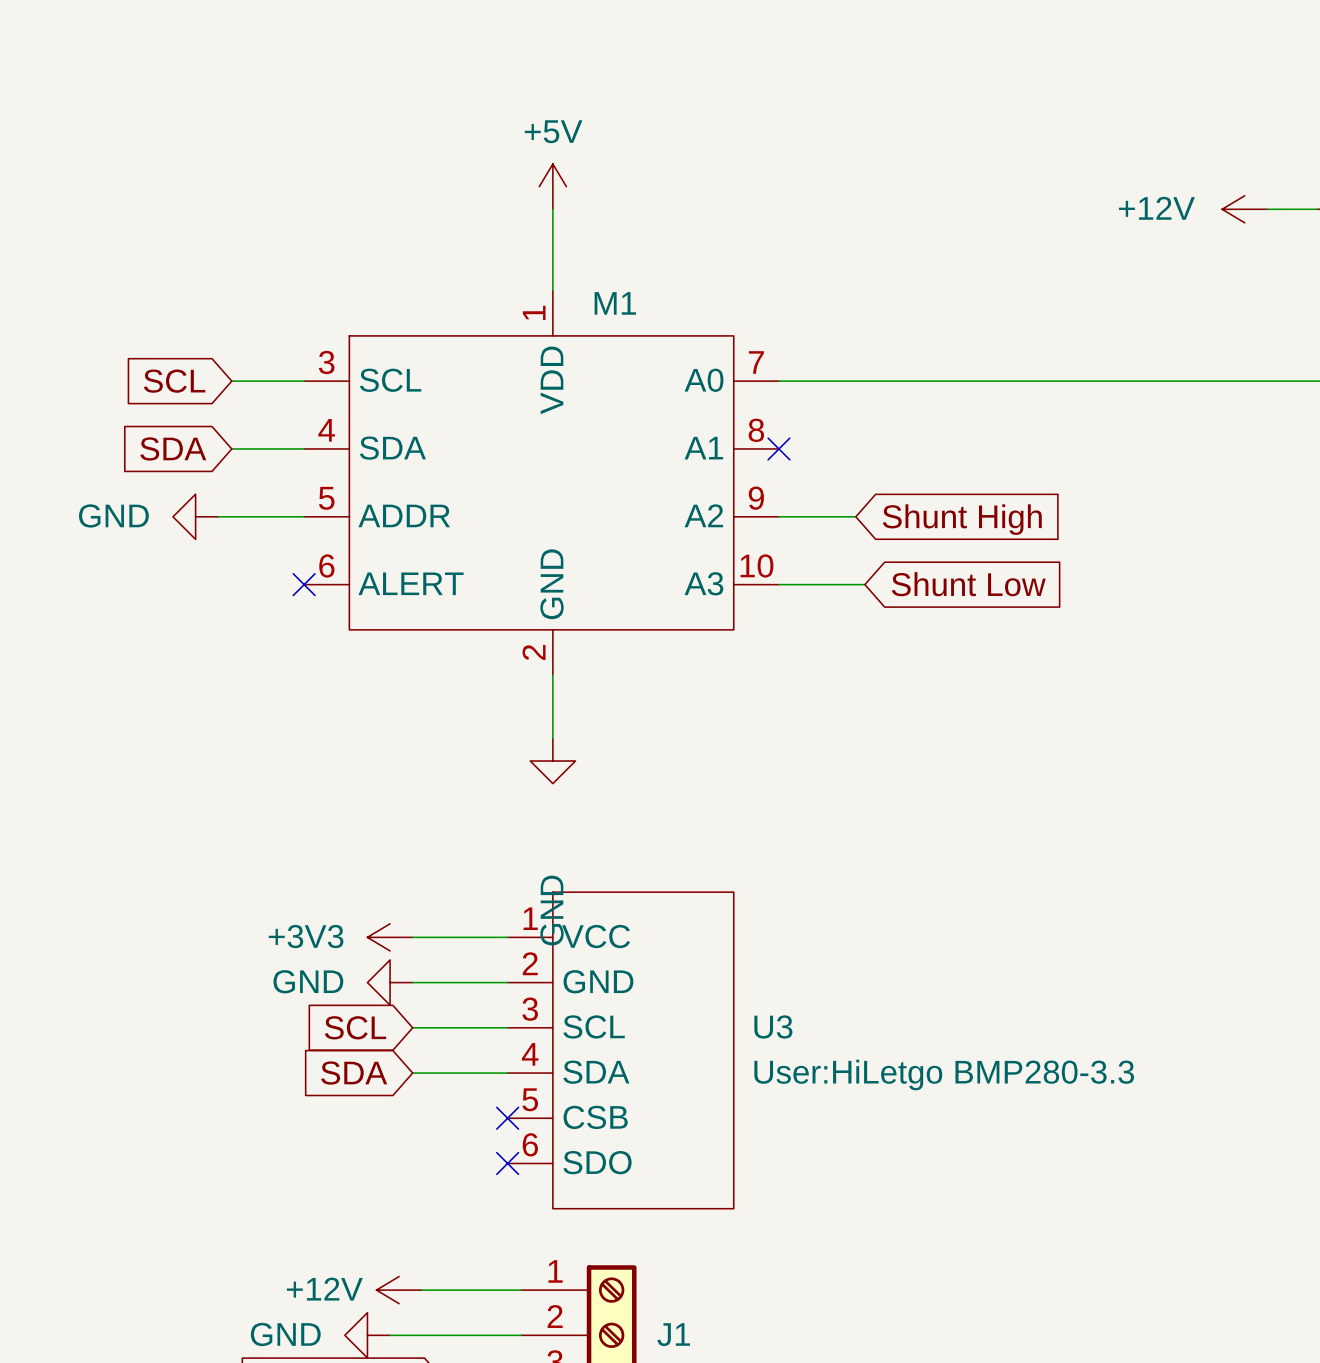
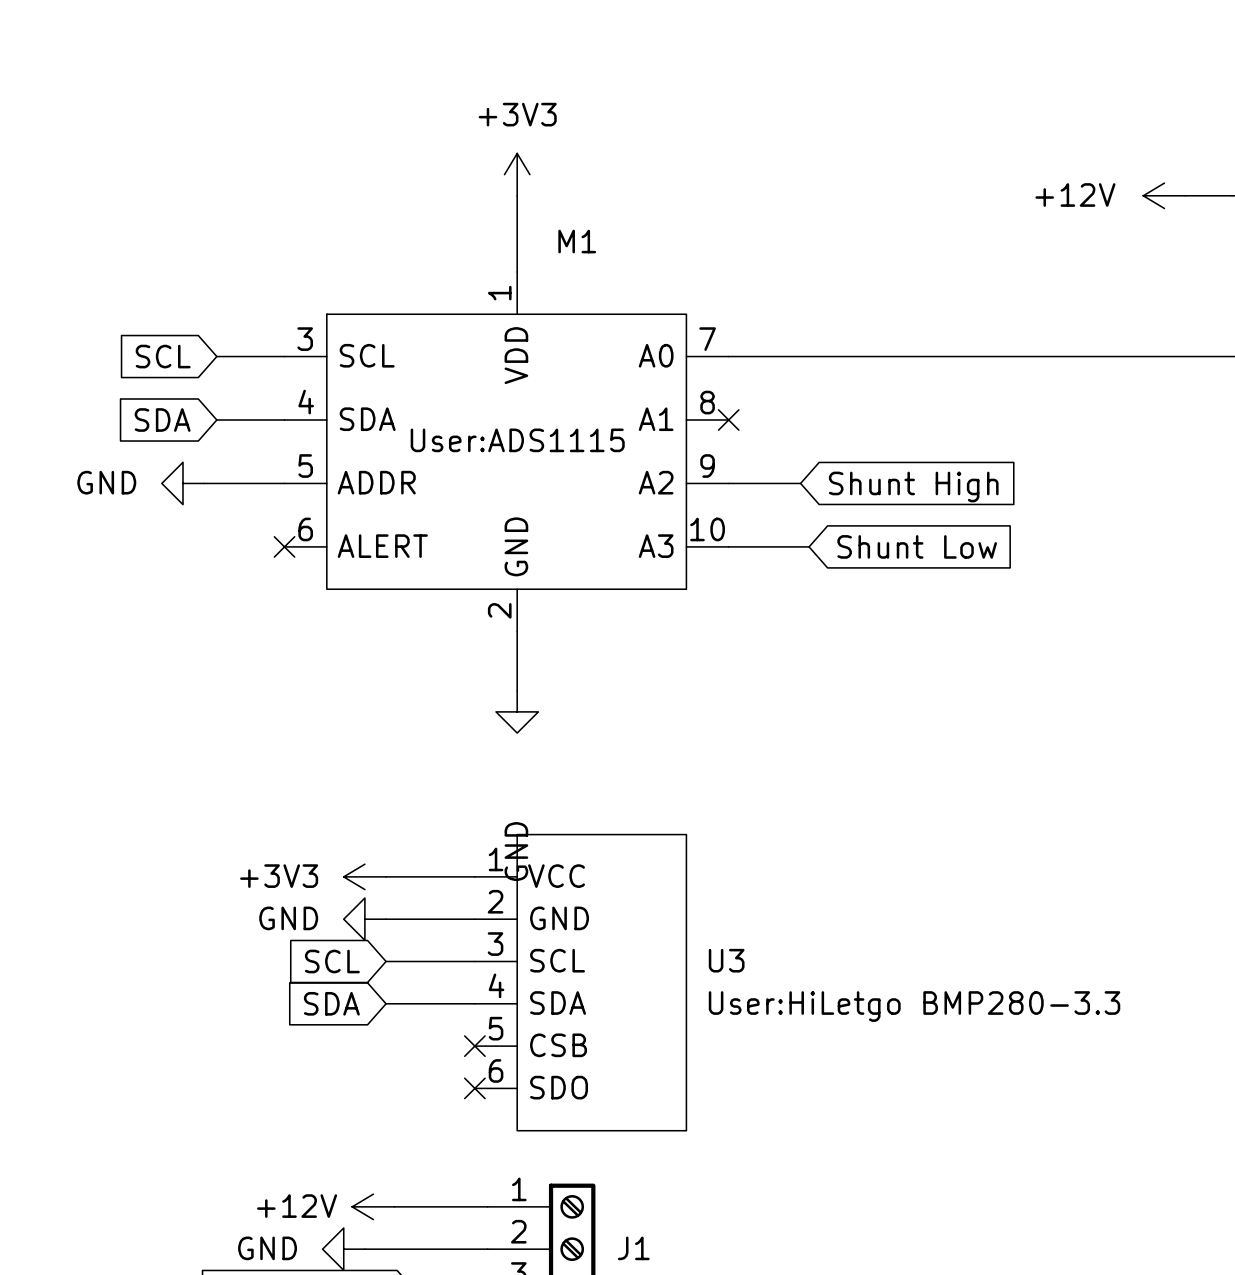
power symbol: +5V (552, 186) -> +3V3 (517, 174)
M1 name position: M1 (615, 303) -> M1 (577, 241)
M1 text: none -> User:ADS1115 (517, 440)

